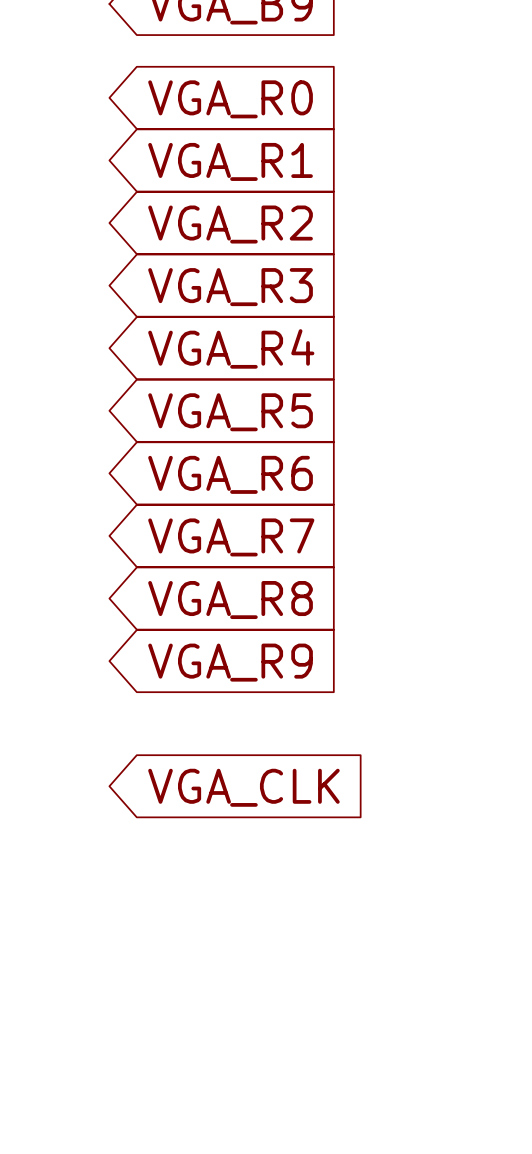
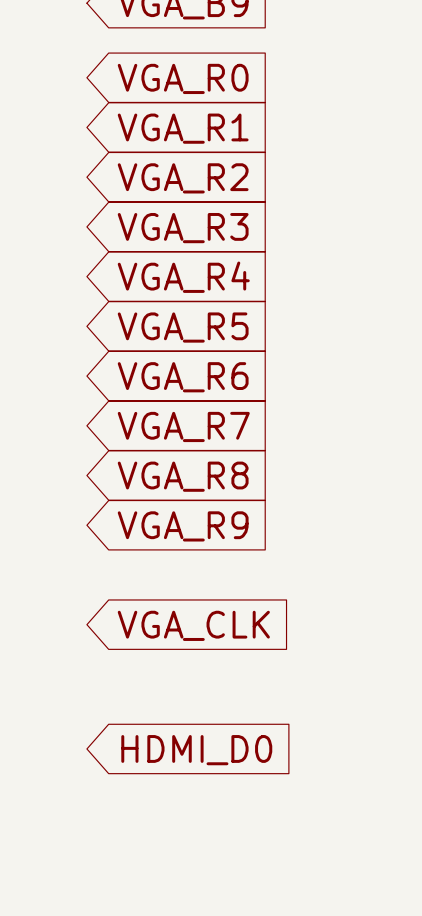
global label: none -> HDMI_D0 (196, 750)

